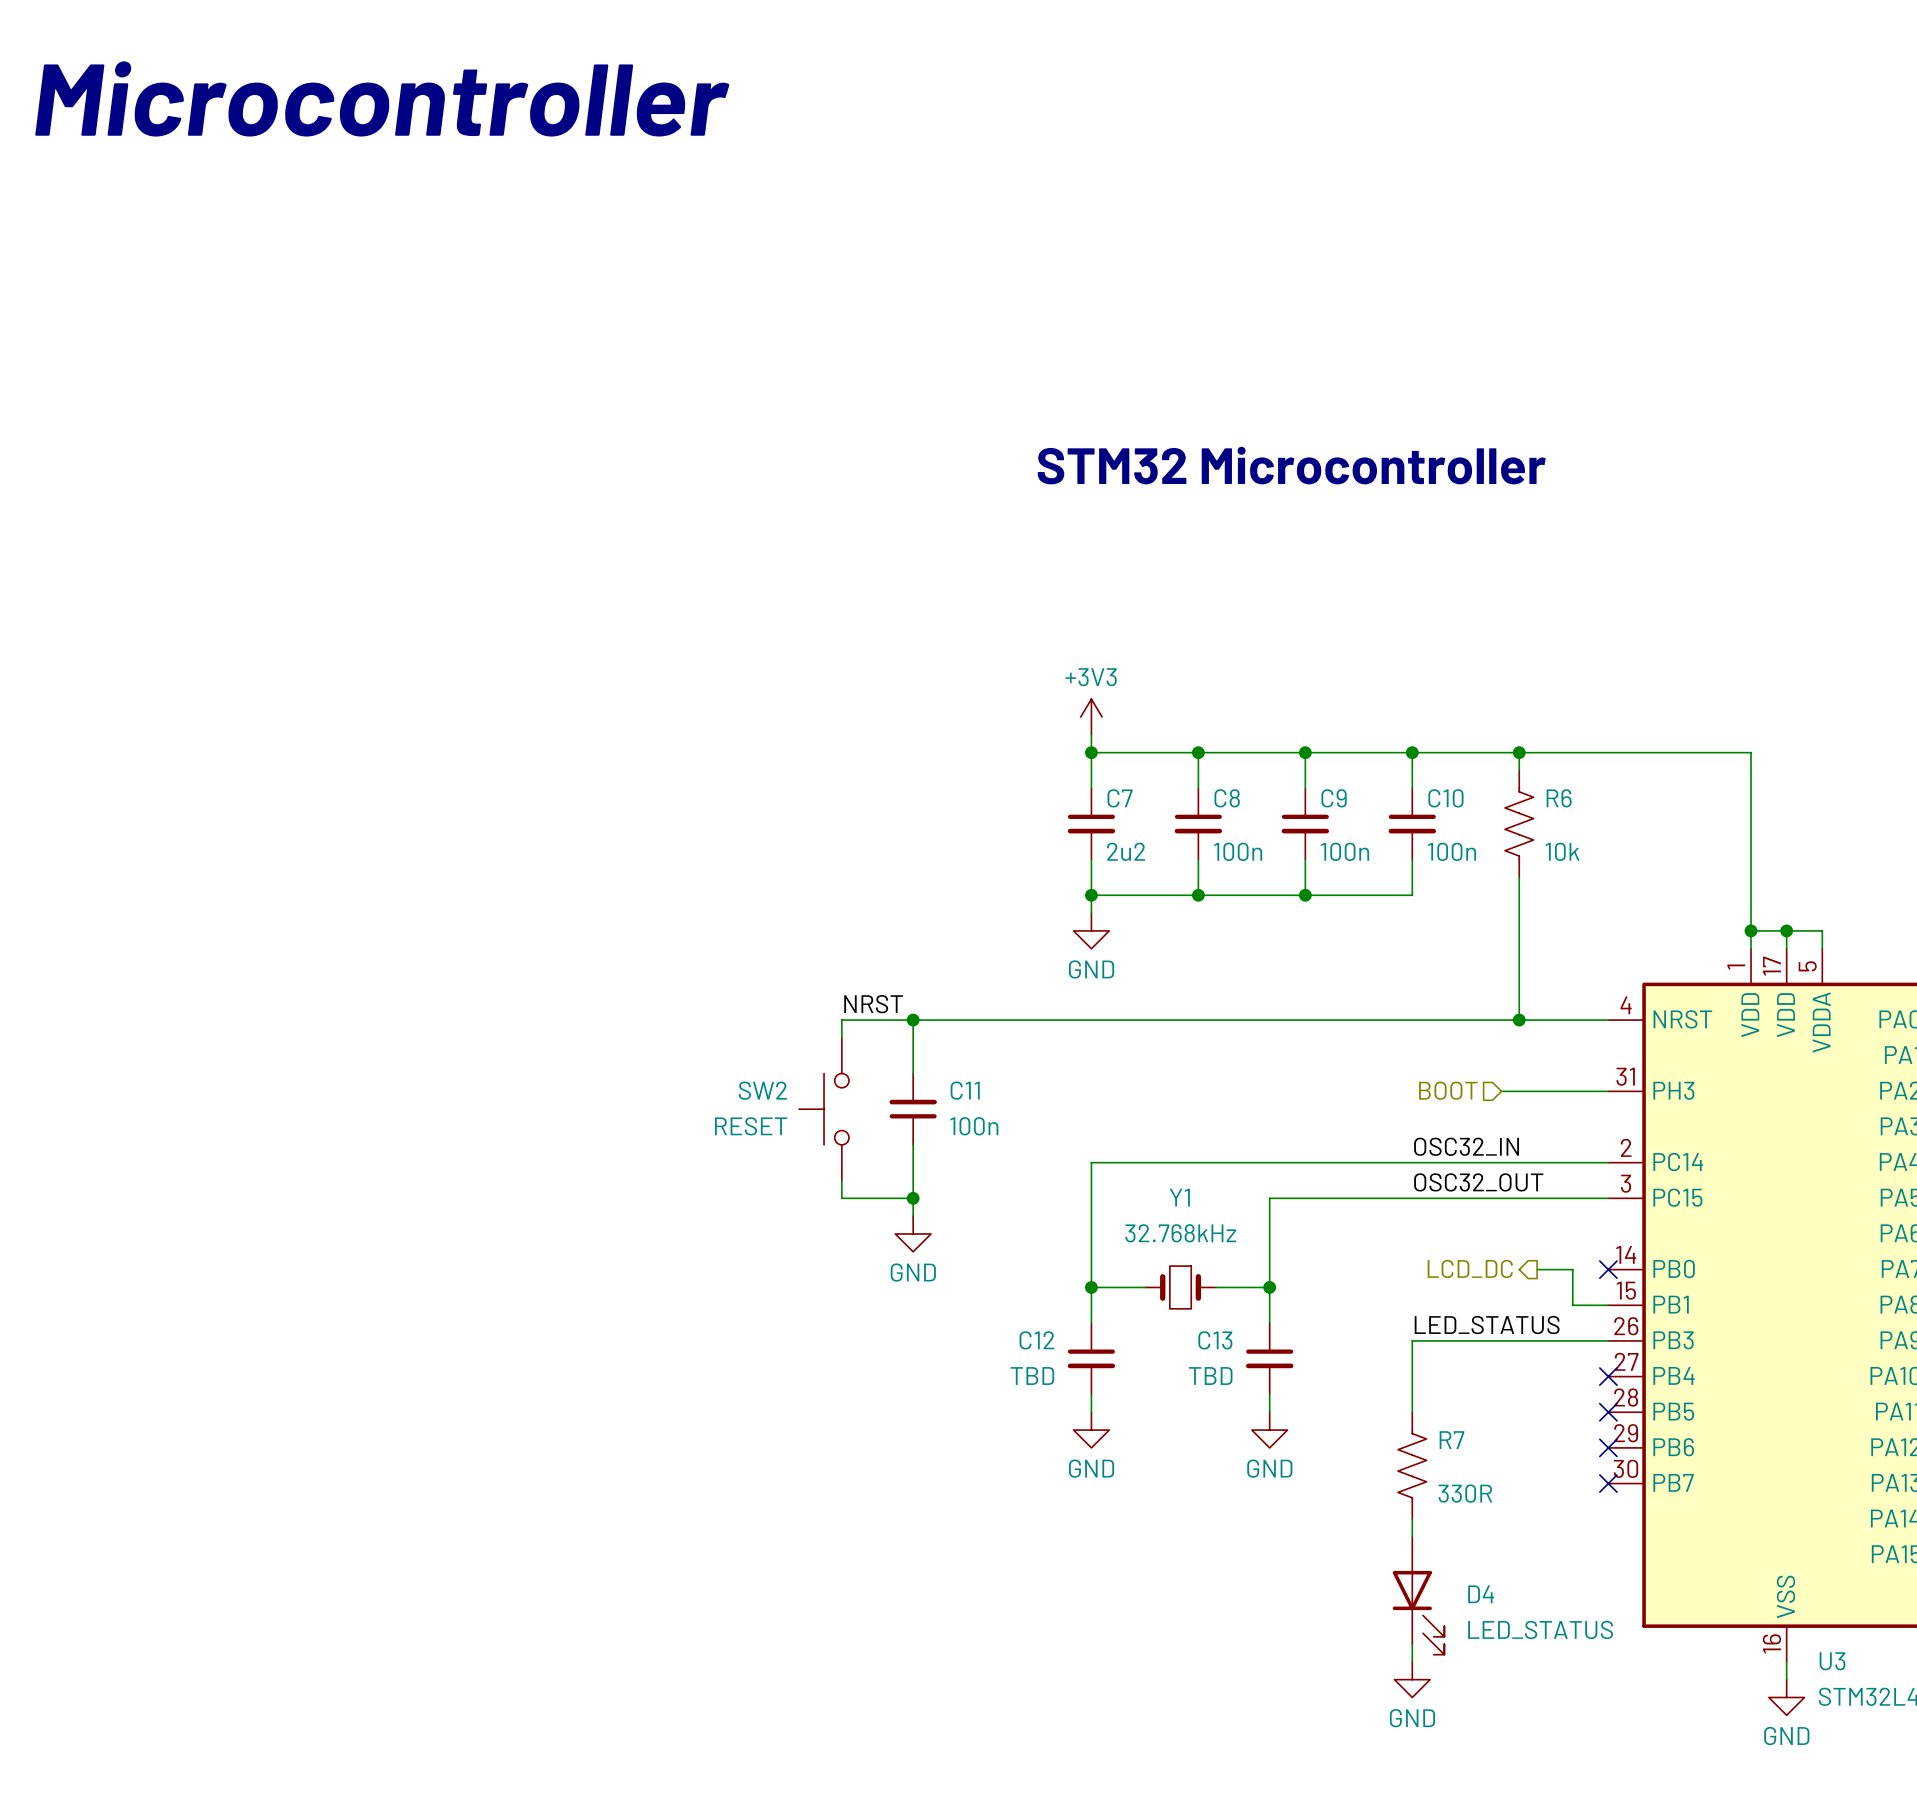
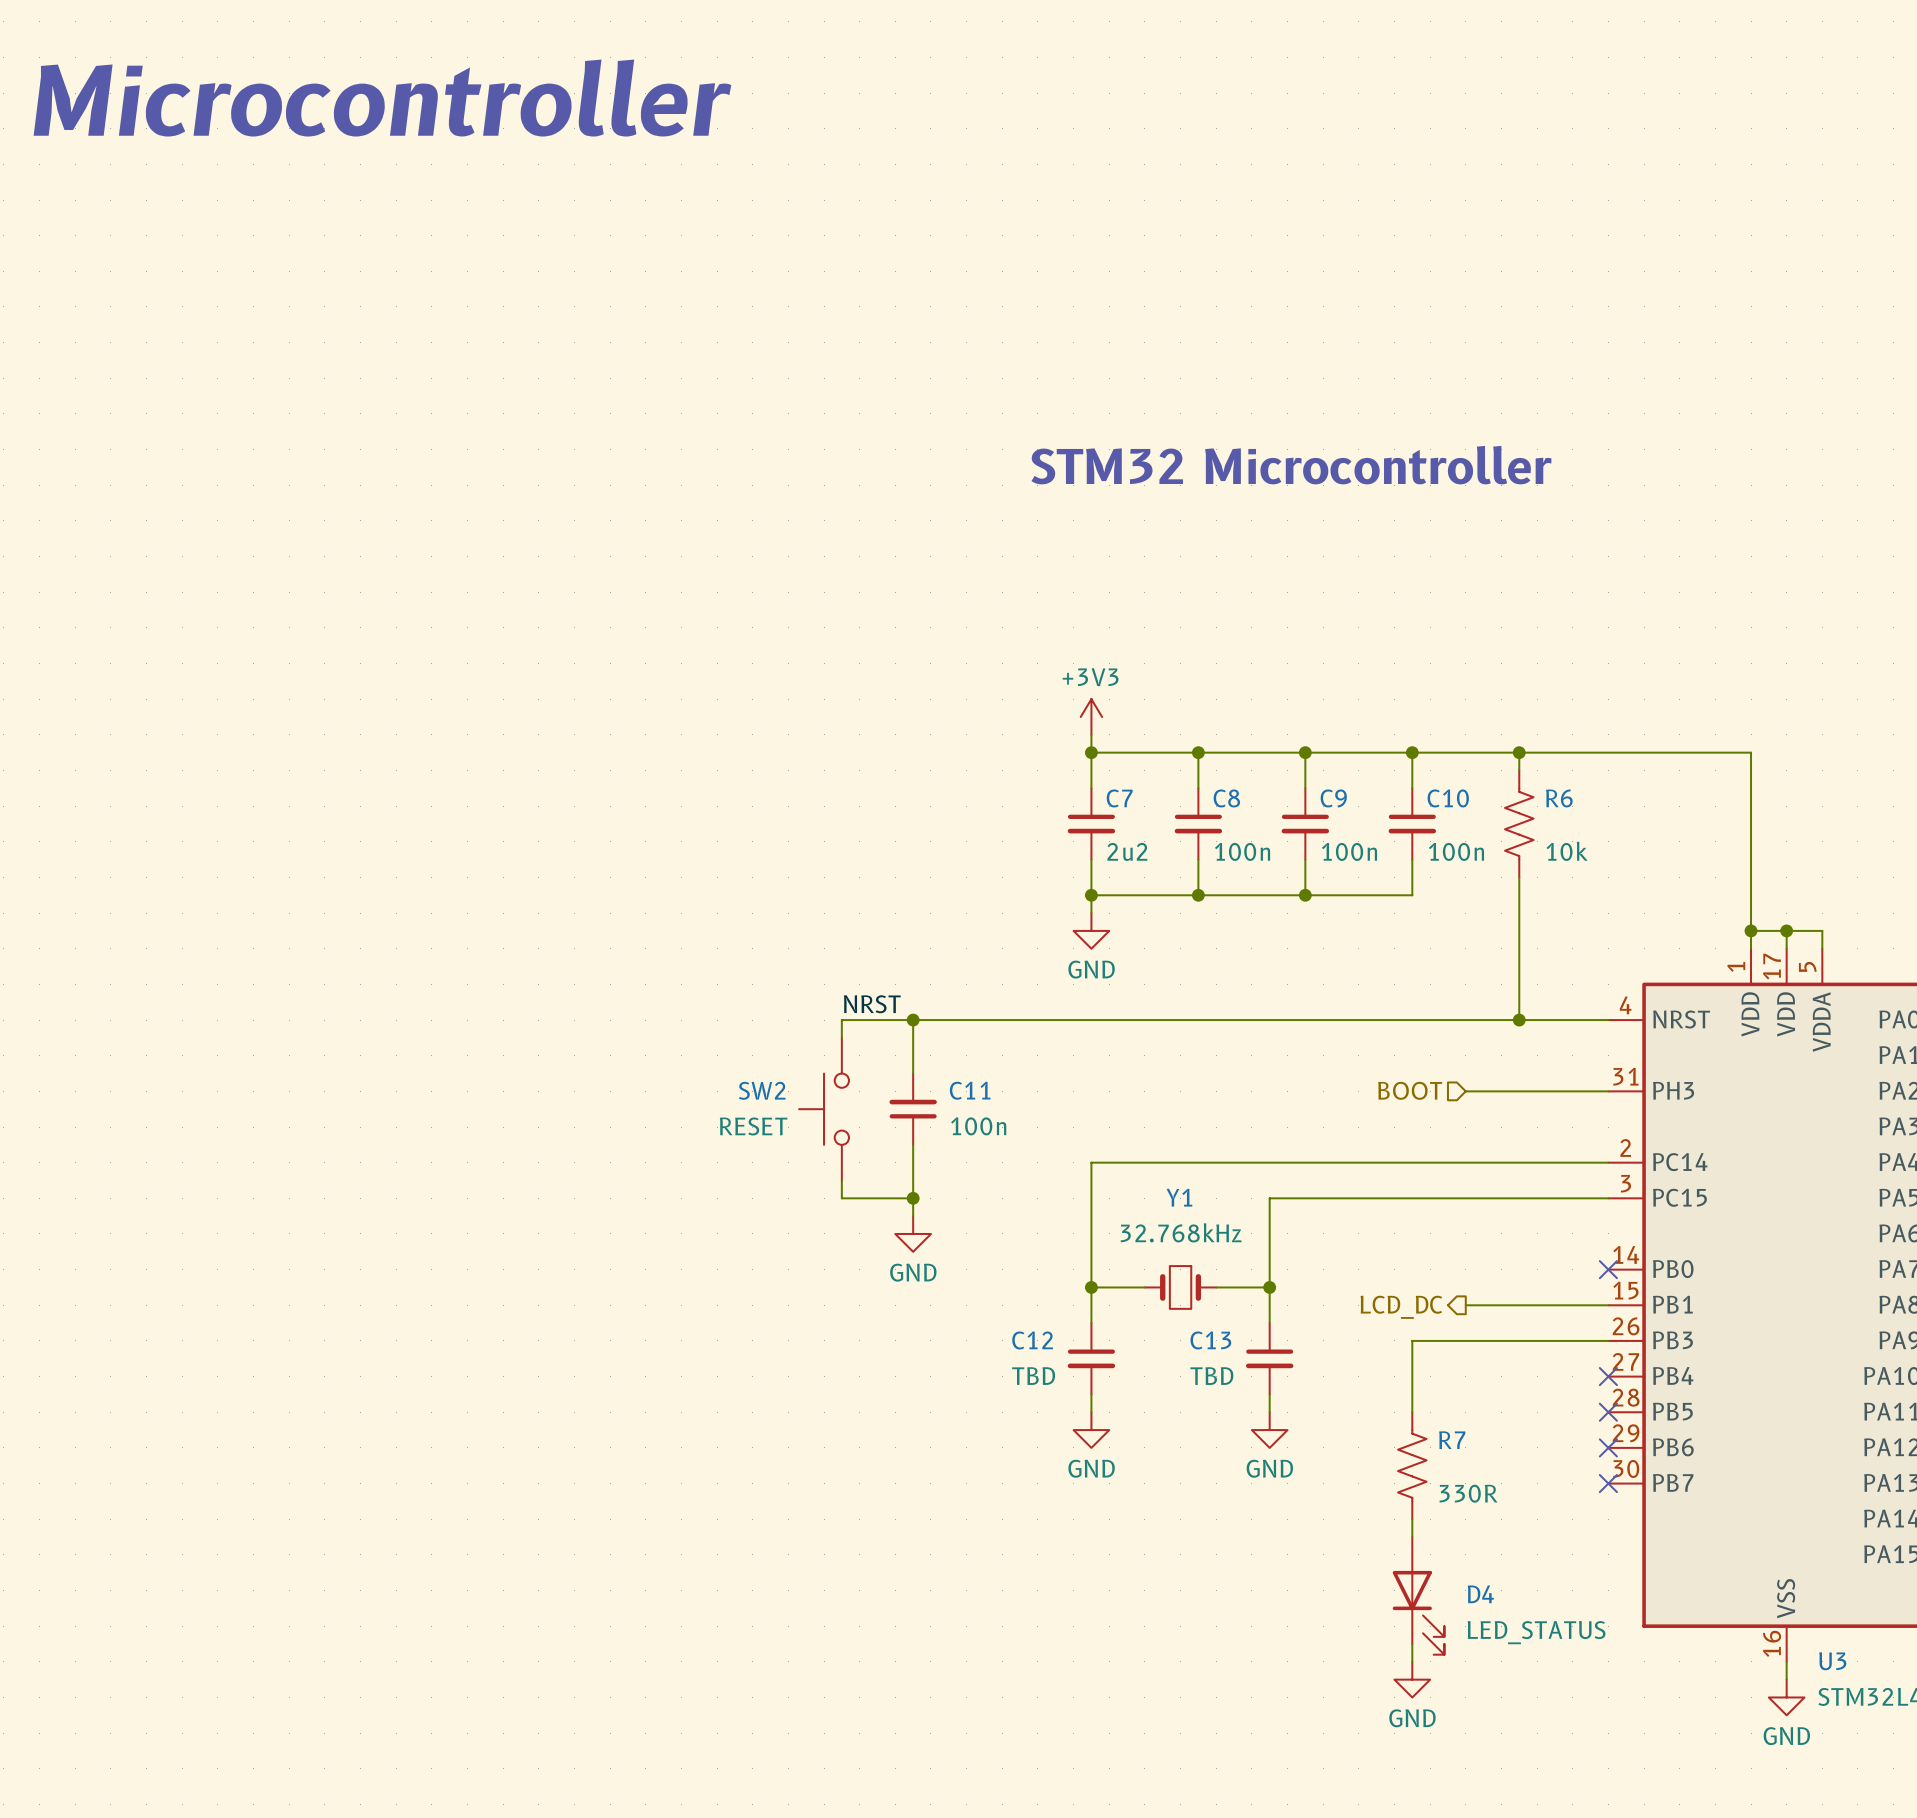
hierarchical label position: BOOT (1448, 1090) -> BOOT (1410, 1090)
wire: none -> (1465, 1091) (1501, 1091)
label: OSC32_IN (1466, 1146) -> none
label: OSC32_OUT (1478, 1182) -> none
hierarchical label position: LCD_DC (1470, 1268) -> LCD_DC (1401, 1307)
wire: (1537, 1269) (1572, 1269) (1572, 1305) -> (1465, 1305) (1572, 1305)
label: LED_STATUS (1487, 1325) -> none

